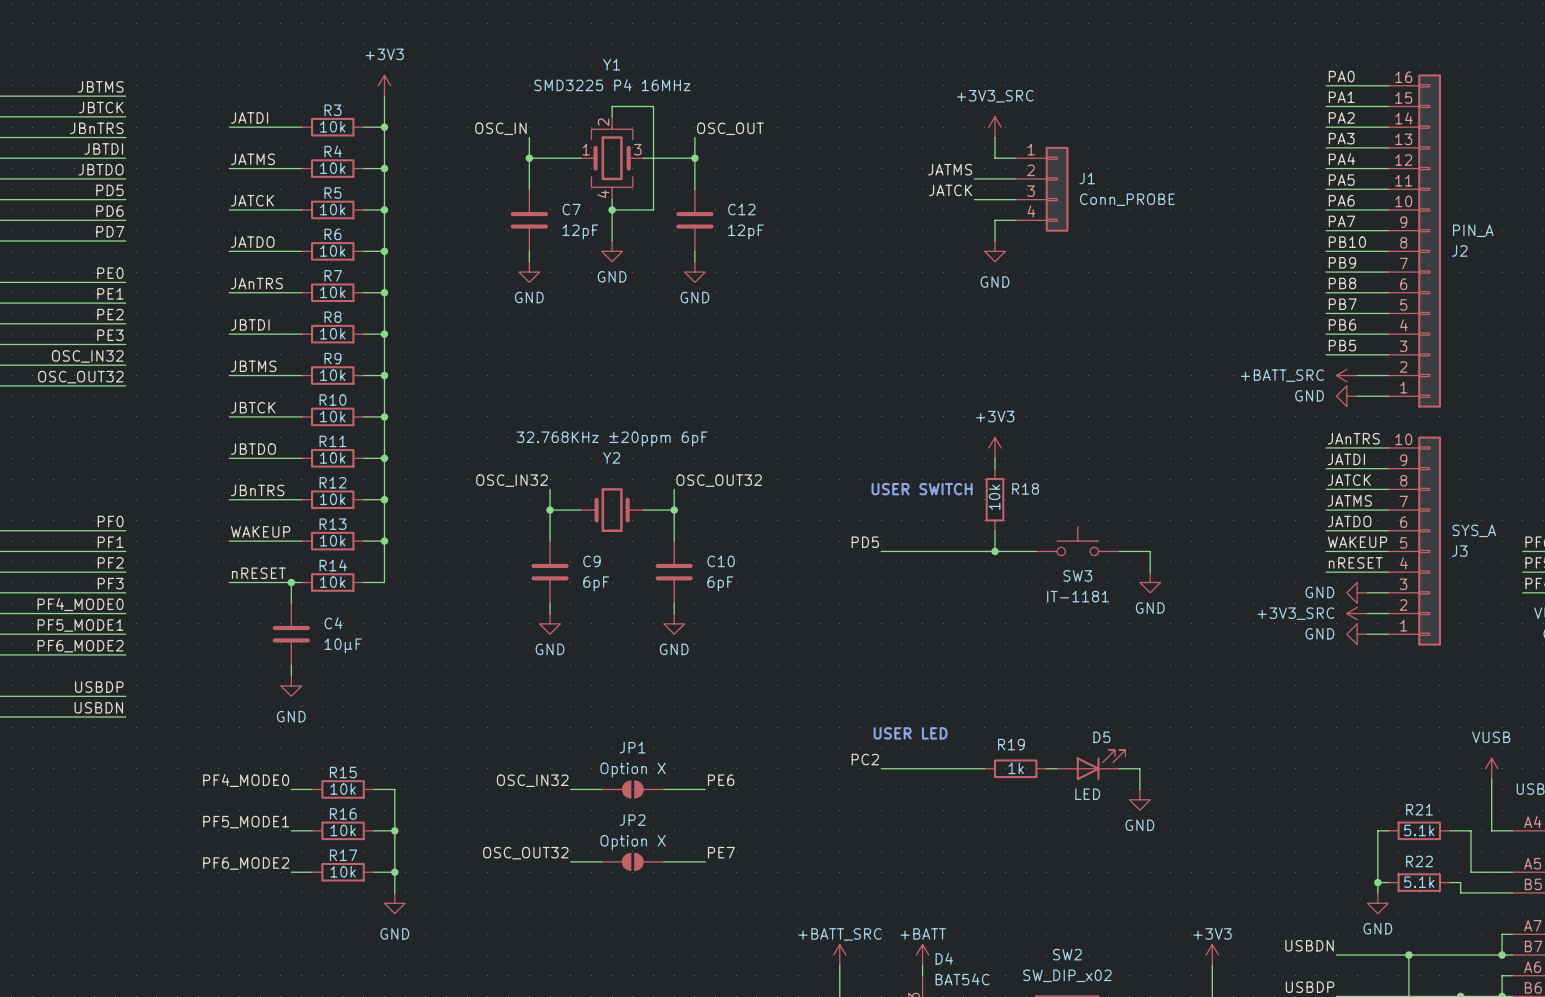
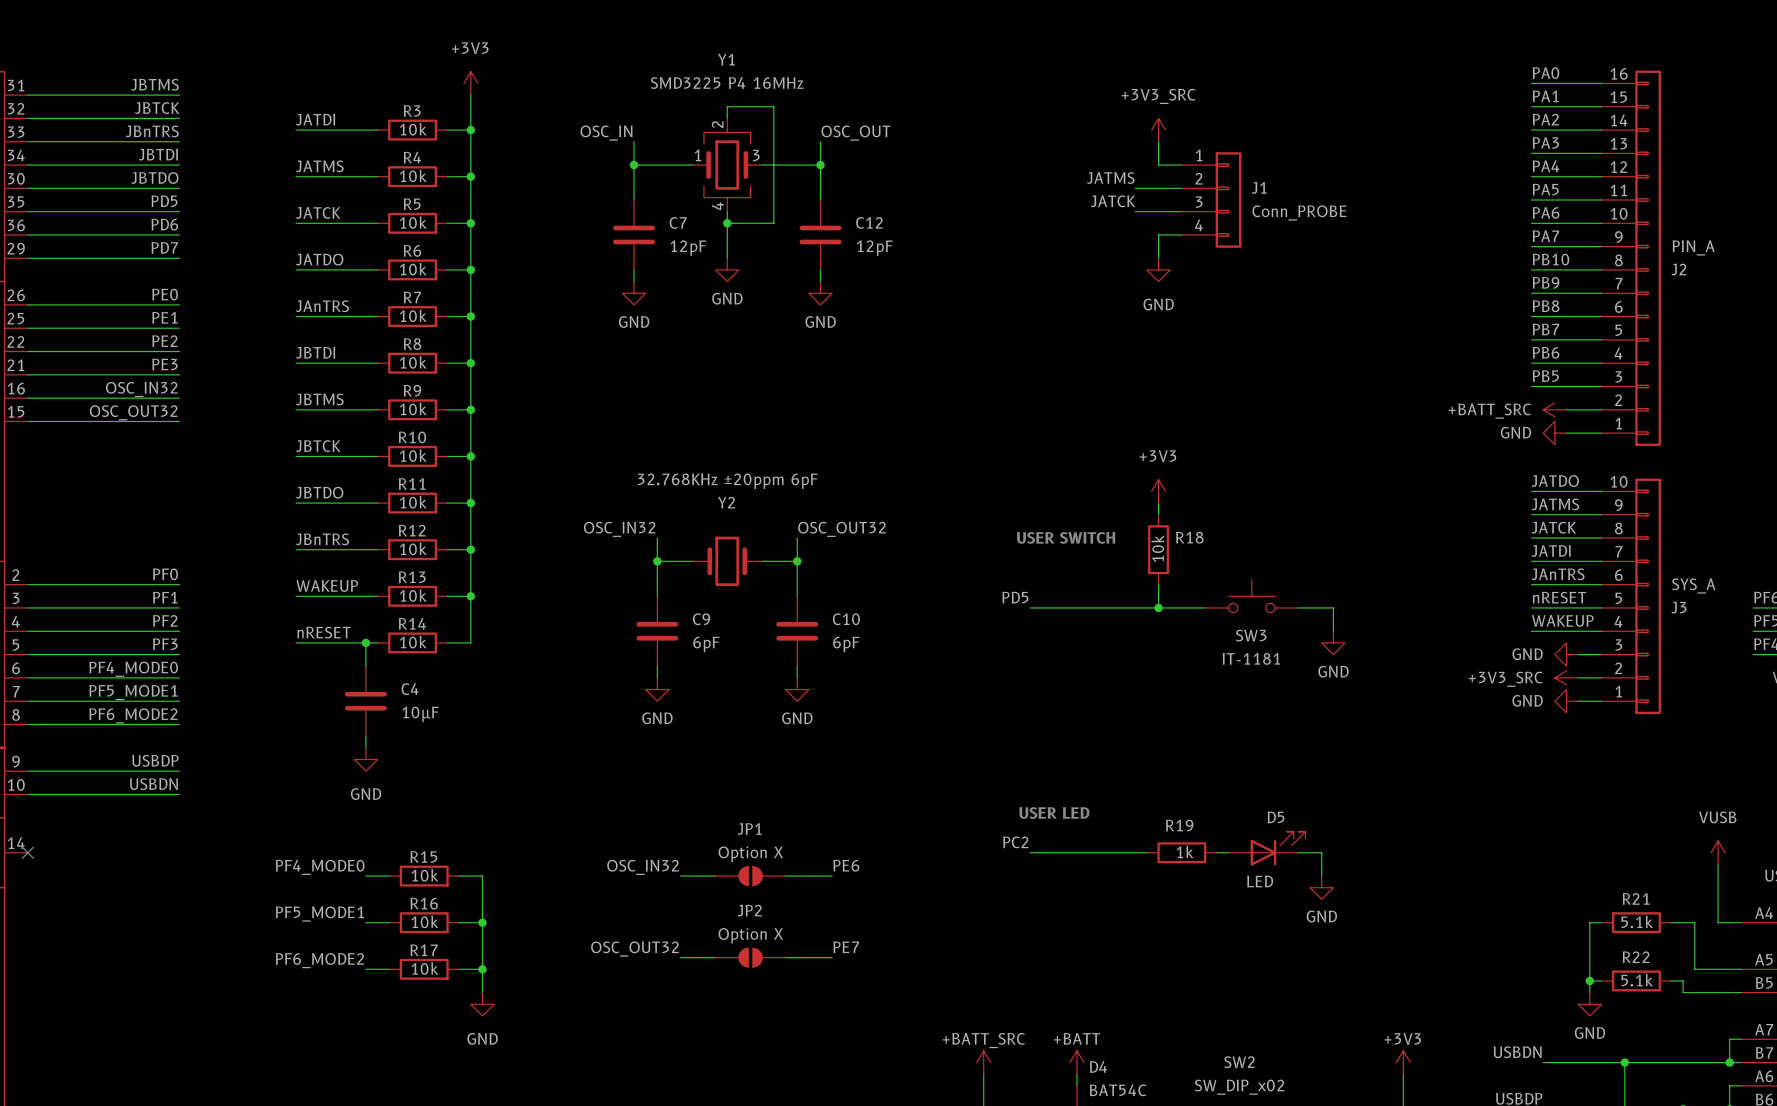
label: JAnTRS (1353, 438) -> JATDO (1555, 481)
label: JATDI (1346, 459) -> JATMS (1555, 504)
label: JATMS (1349, 500) -> JATDI (1551, 551)
label: JATDO (1349, 521) -> JAnTRS (1558, 574)
label: WAKEUP (1357, 542) -> nRESET (1559, 597)
label: nRESET (1355, 562) -> WAKEUP (1562, 620)

